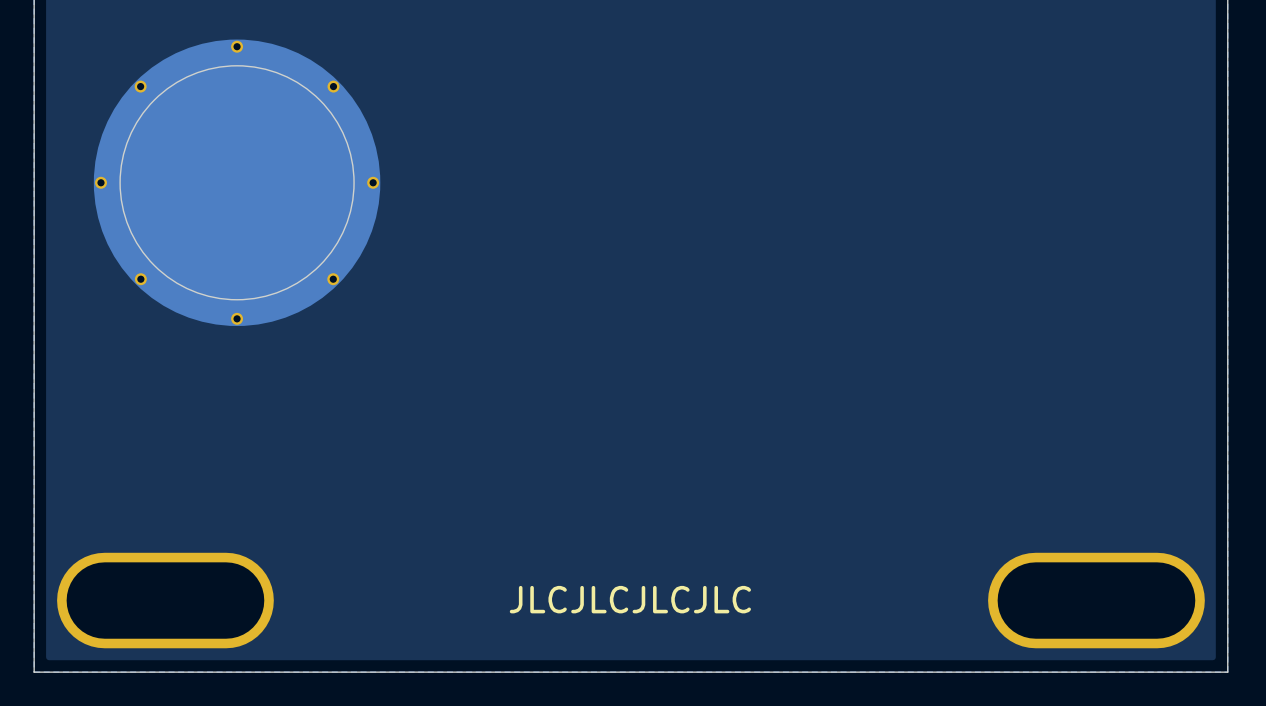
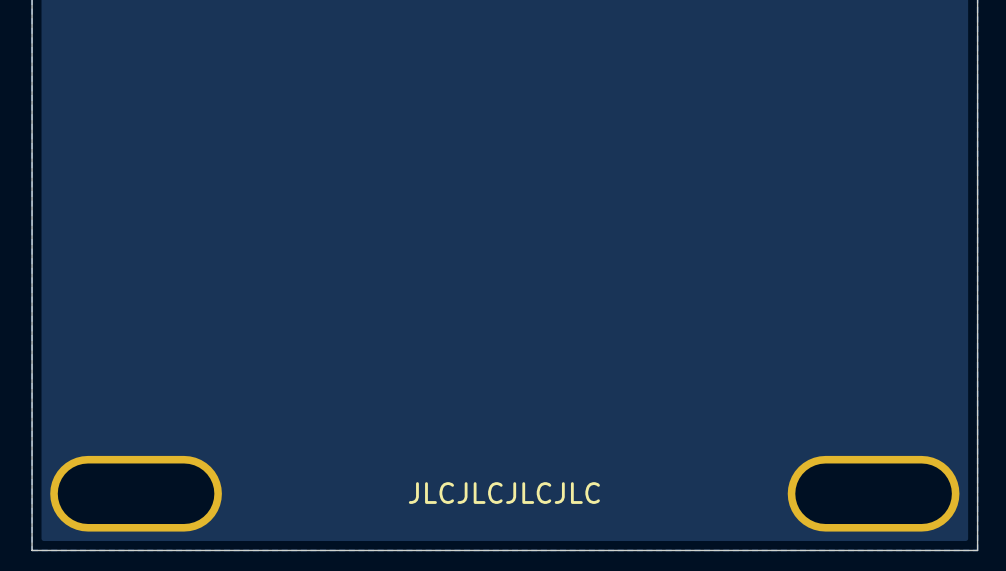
part: (237, 182) -> none

